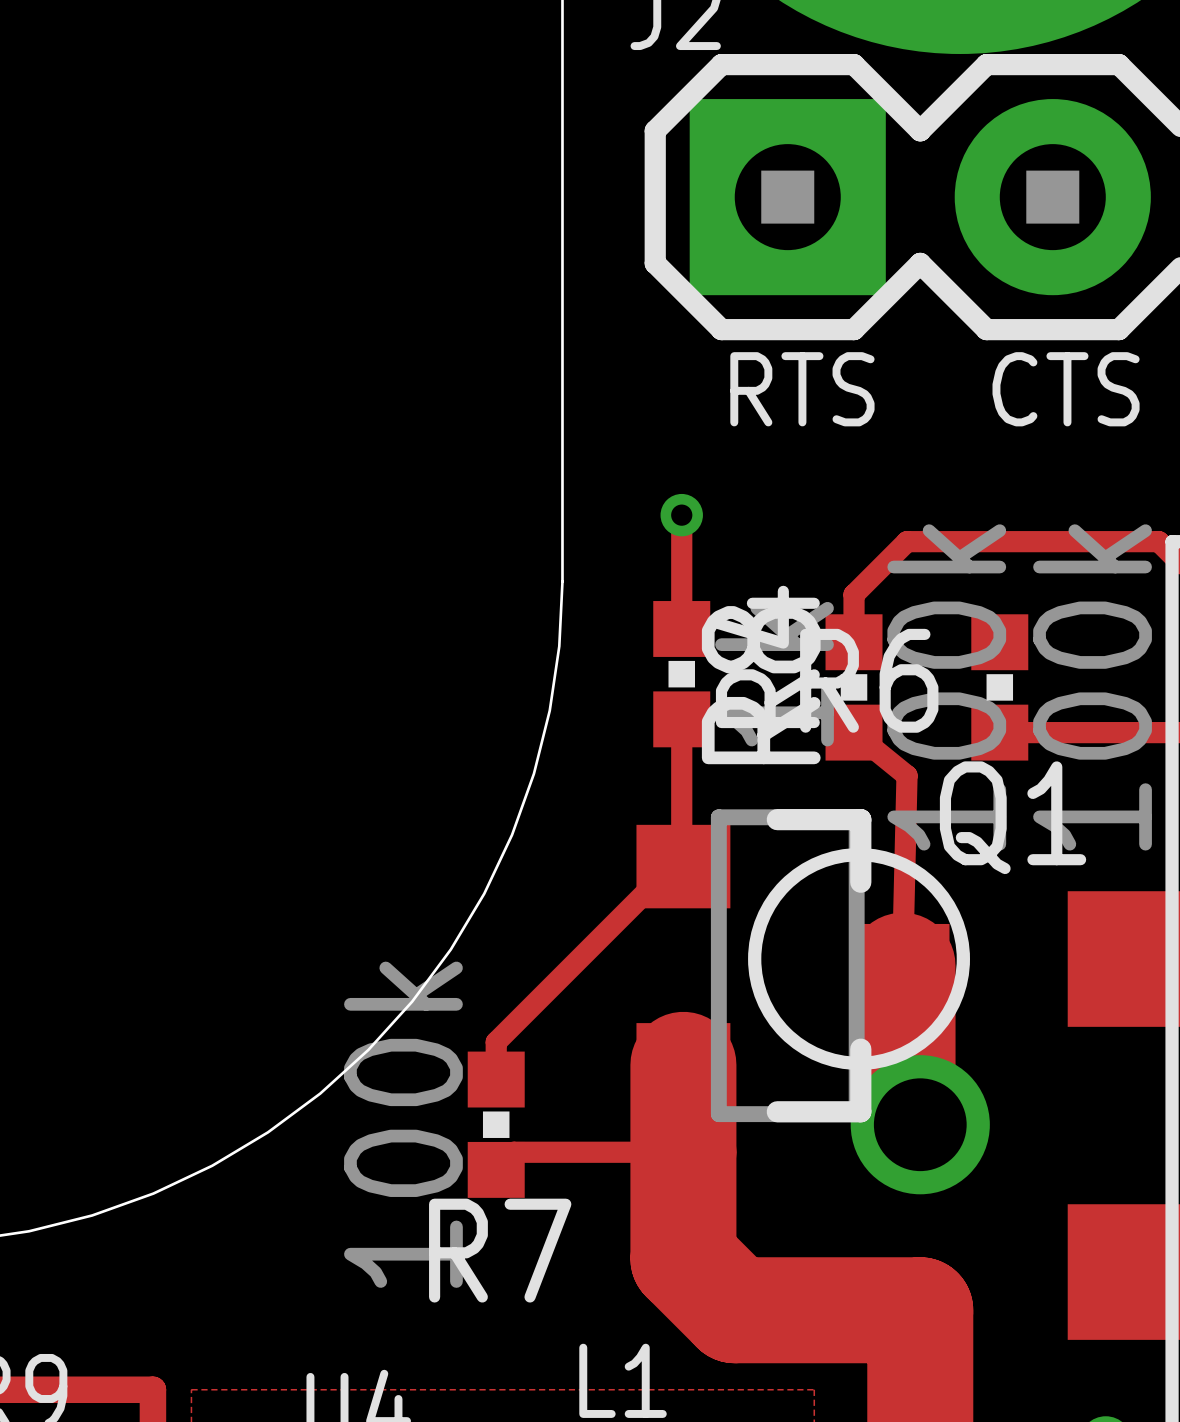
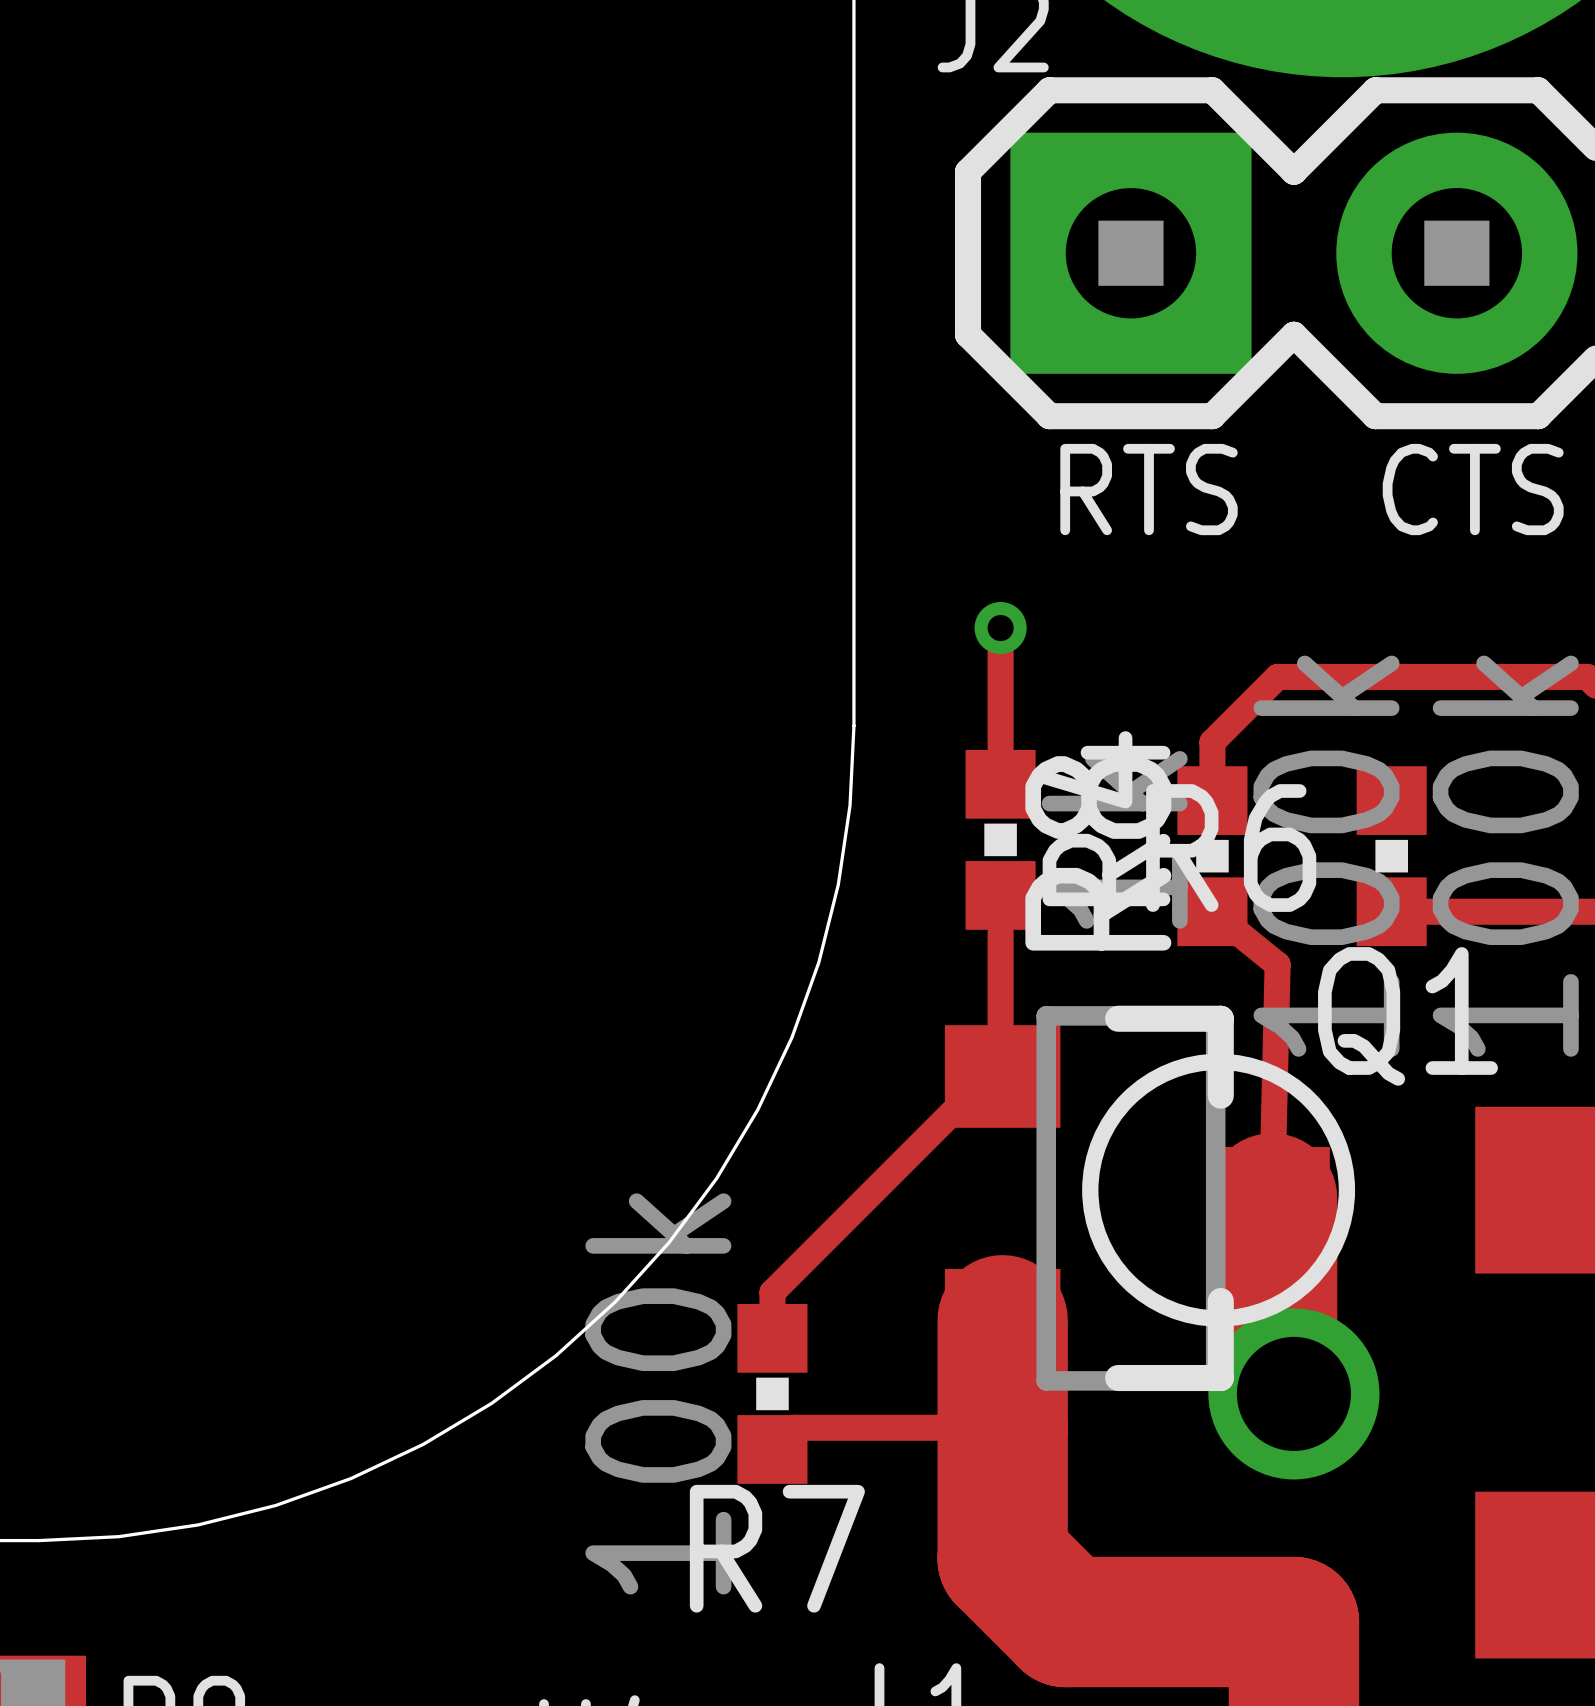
via position: (681, 515) -> (1000, 628)

